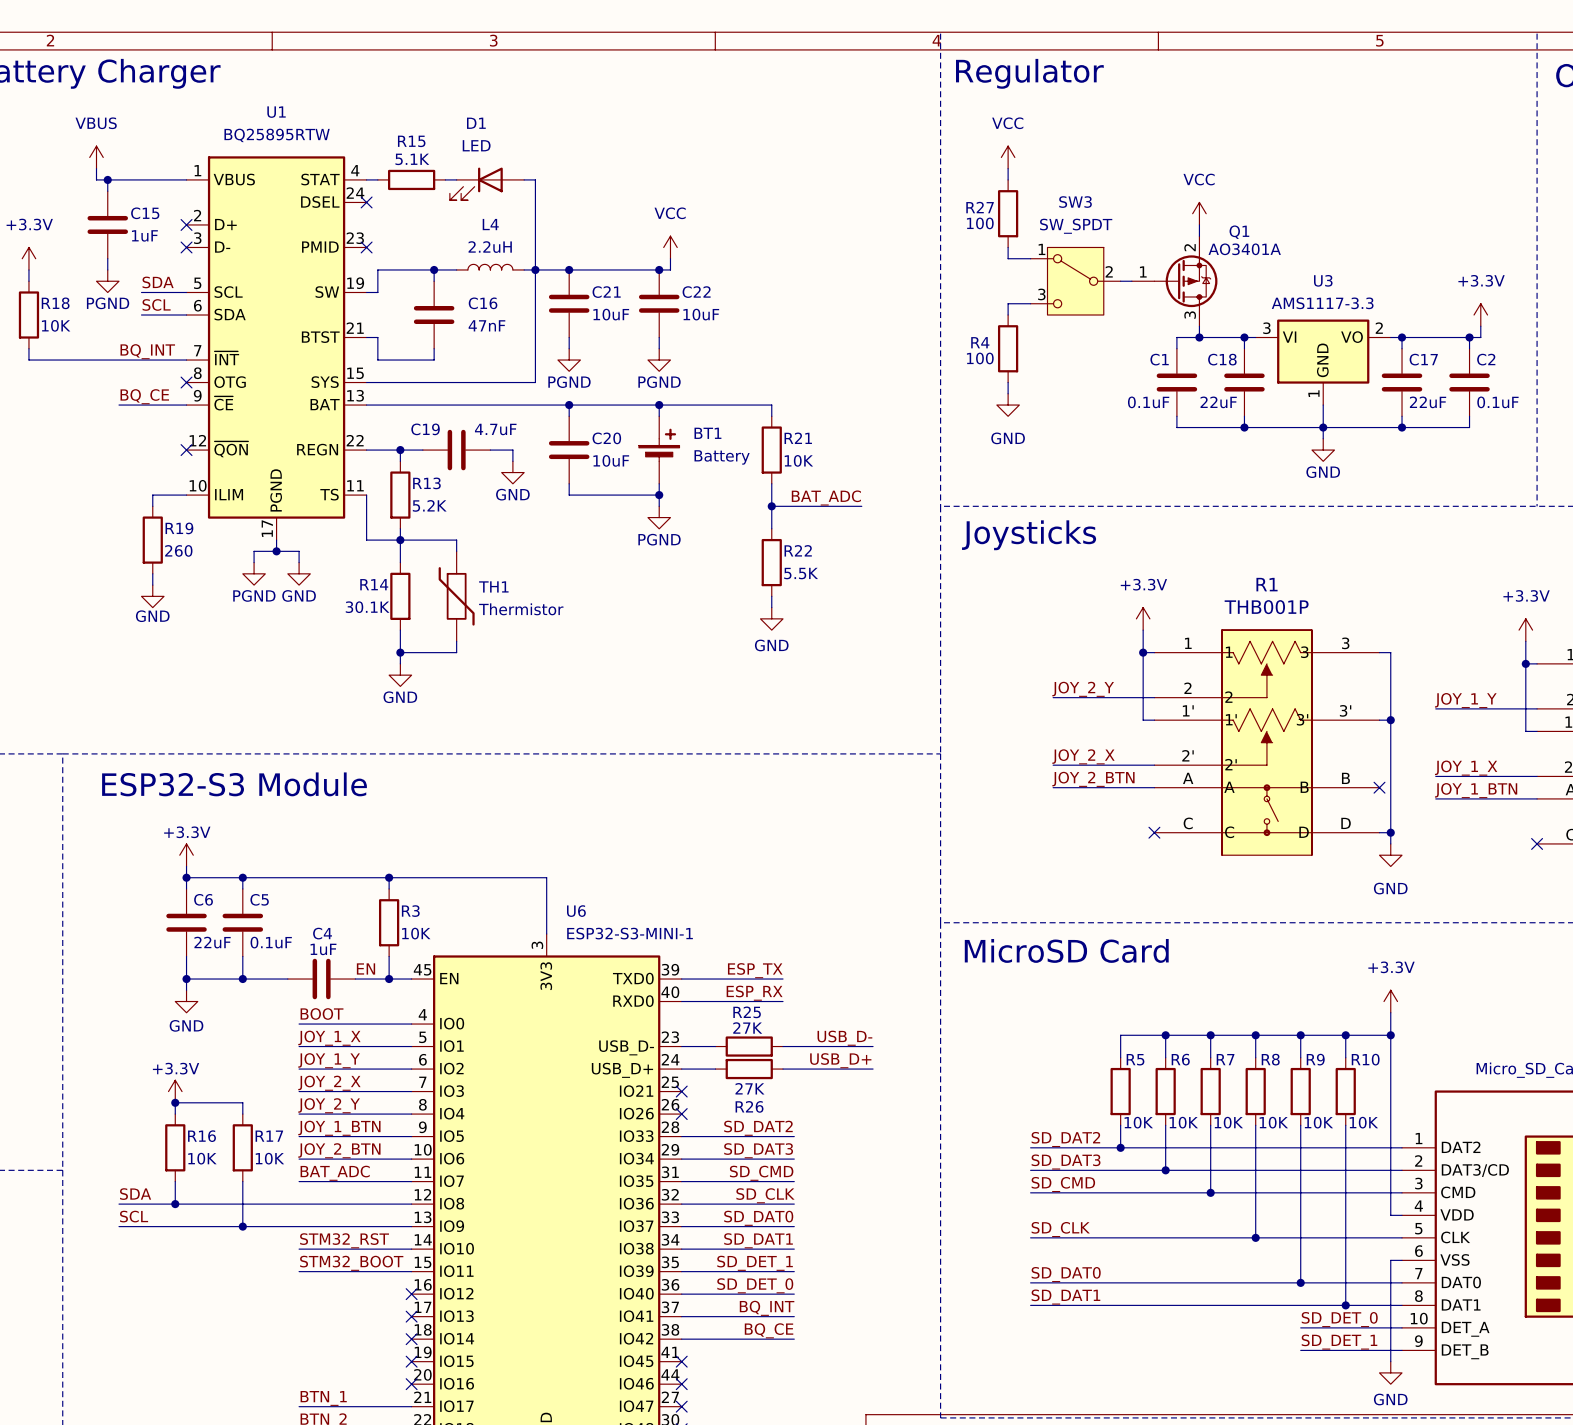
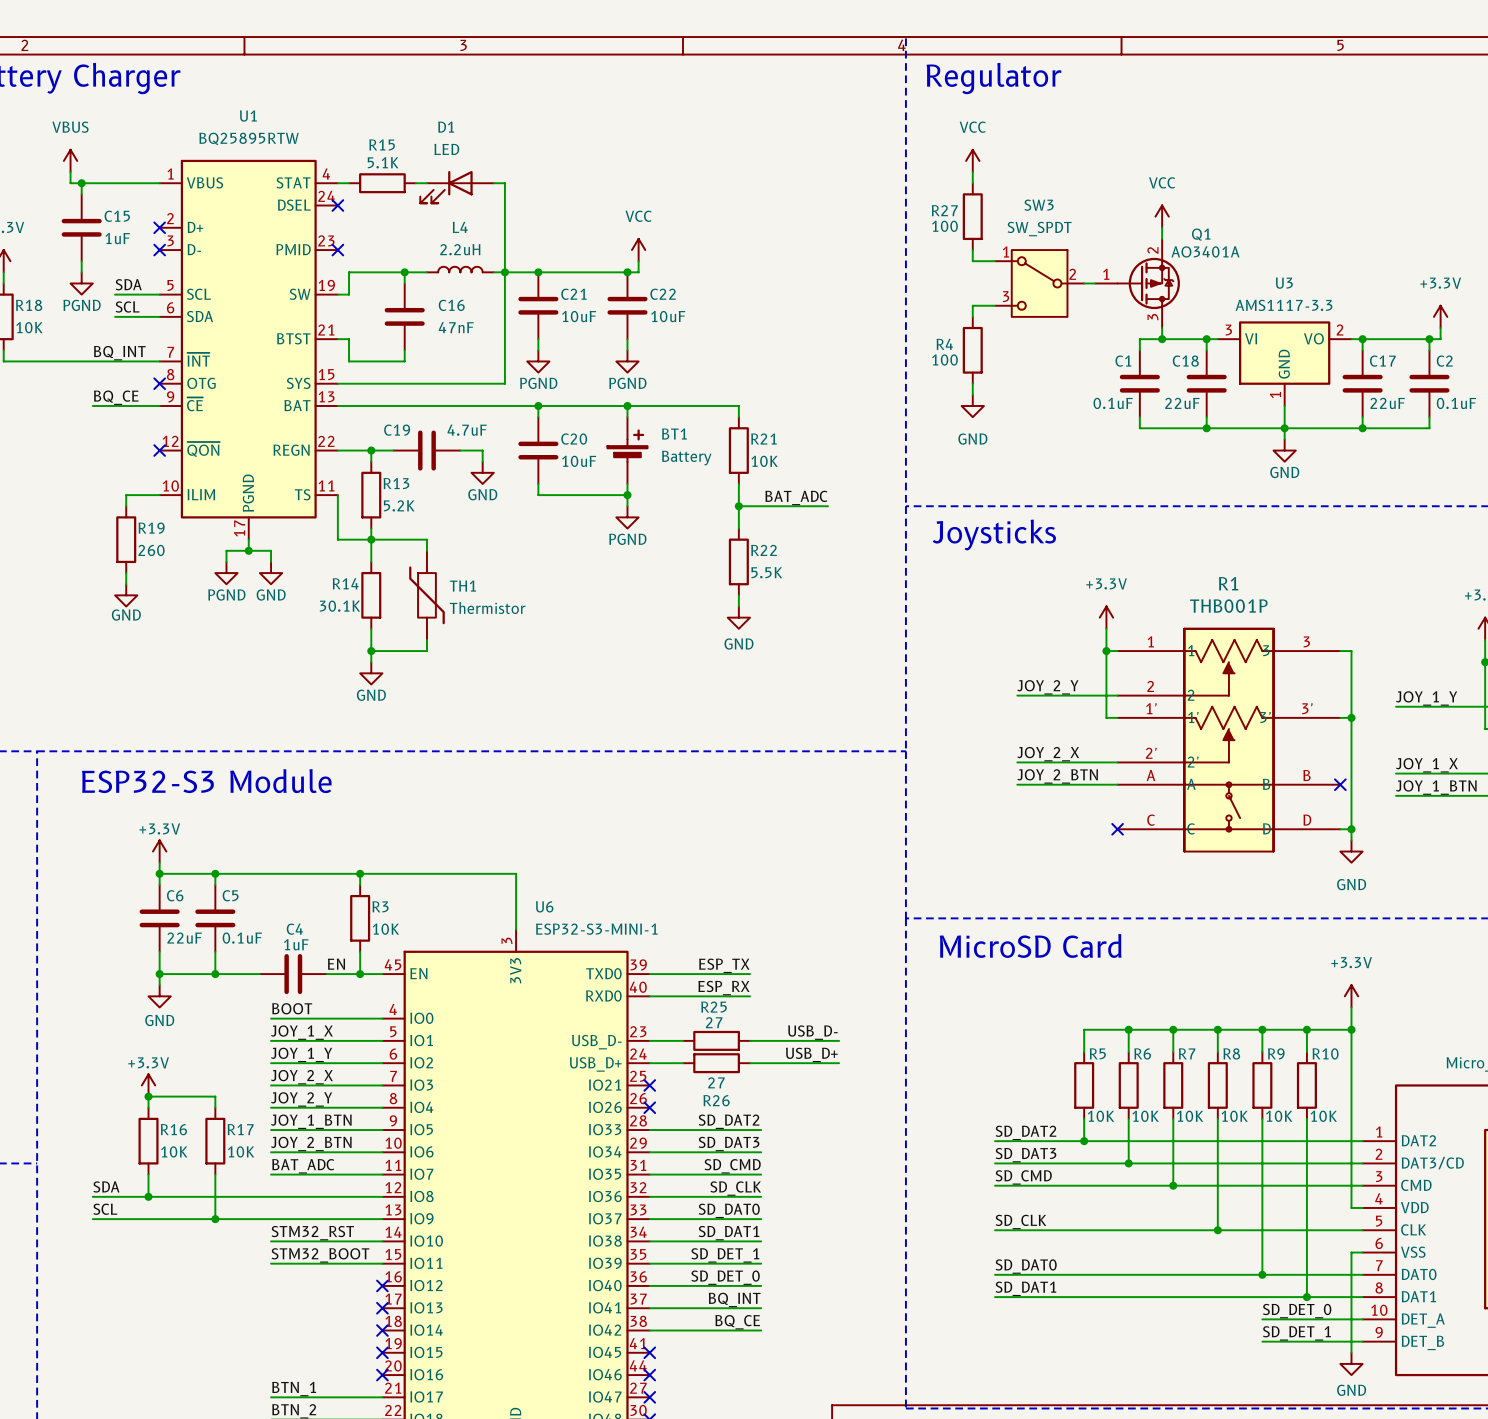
R25 value: 27K (747, 1028) -> 27 (714, 1022)
R26 value: 27K (749, 1088) -> 27 (716, 1082)

